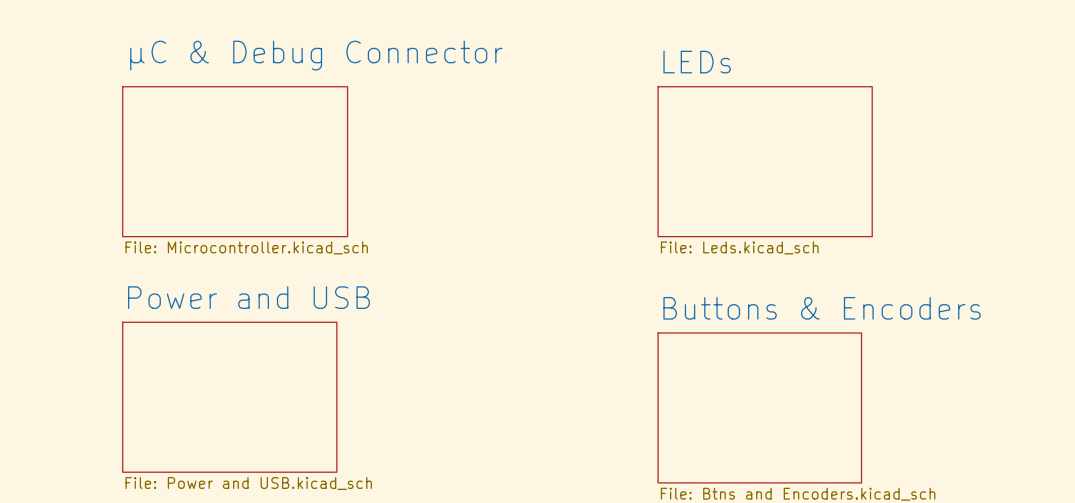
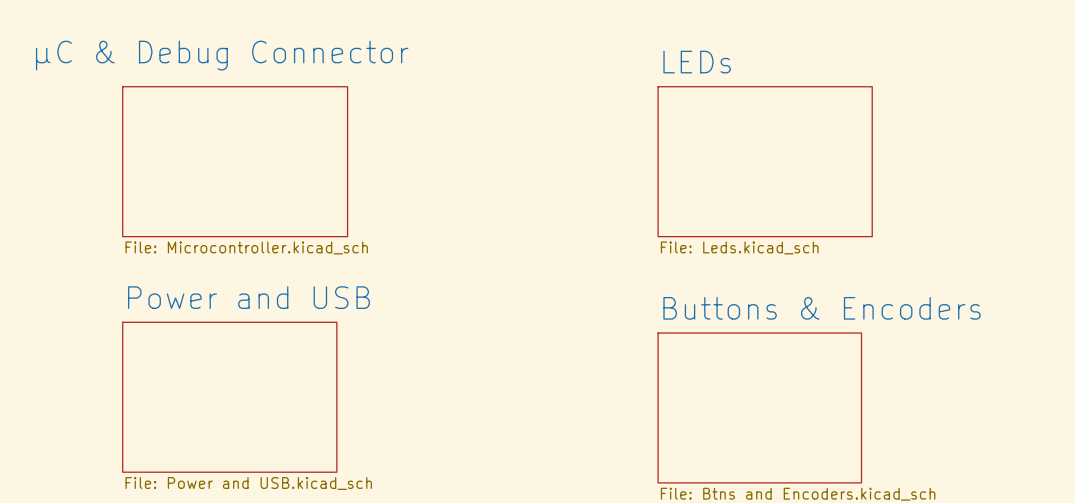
sheet µC & Debug Connector name position: µC & Debug Connector (316, 55) -> µC & Debug Connector (222, 55)

